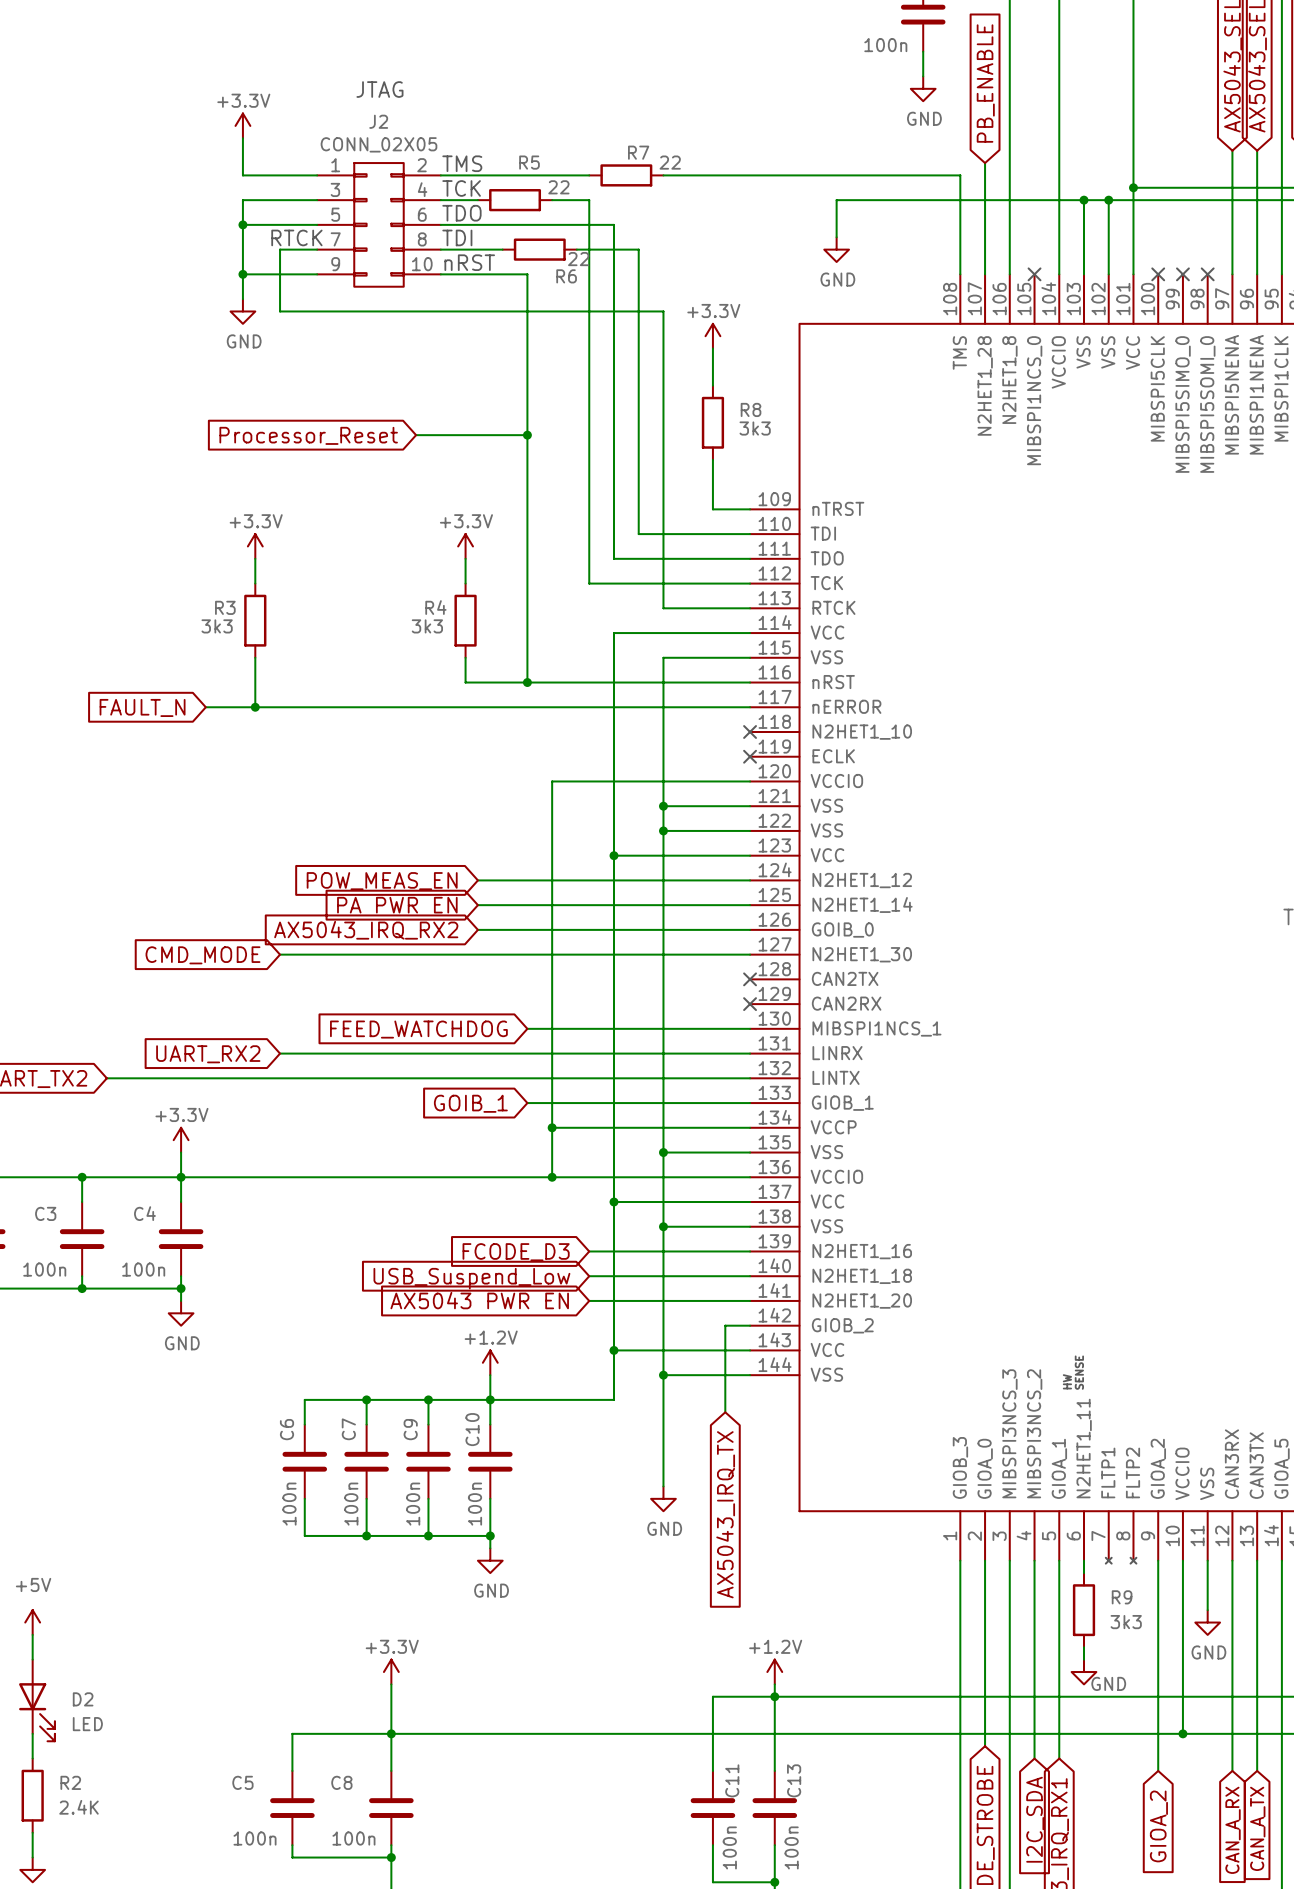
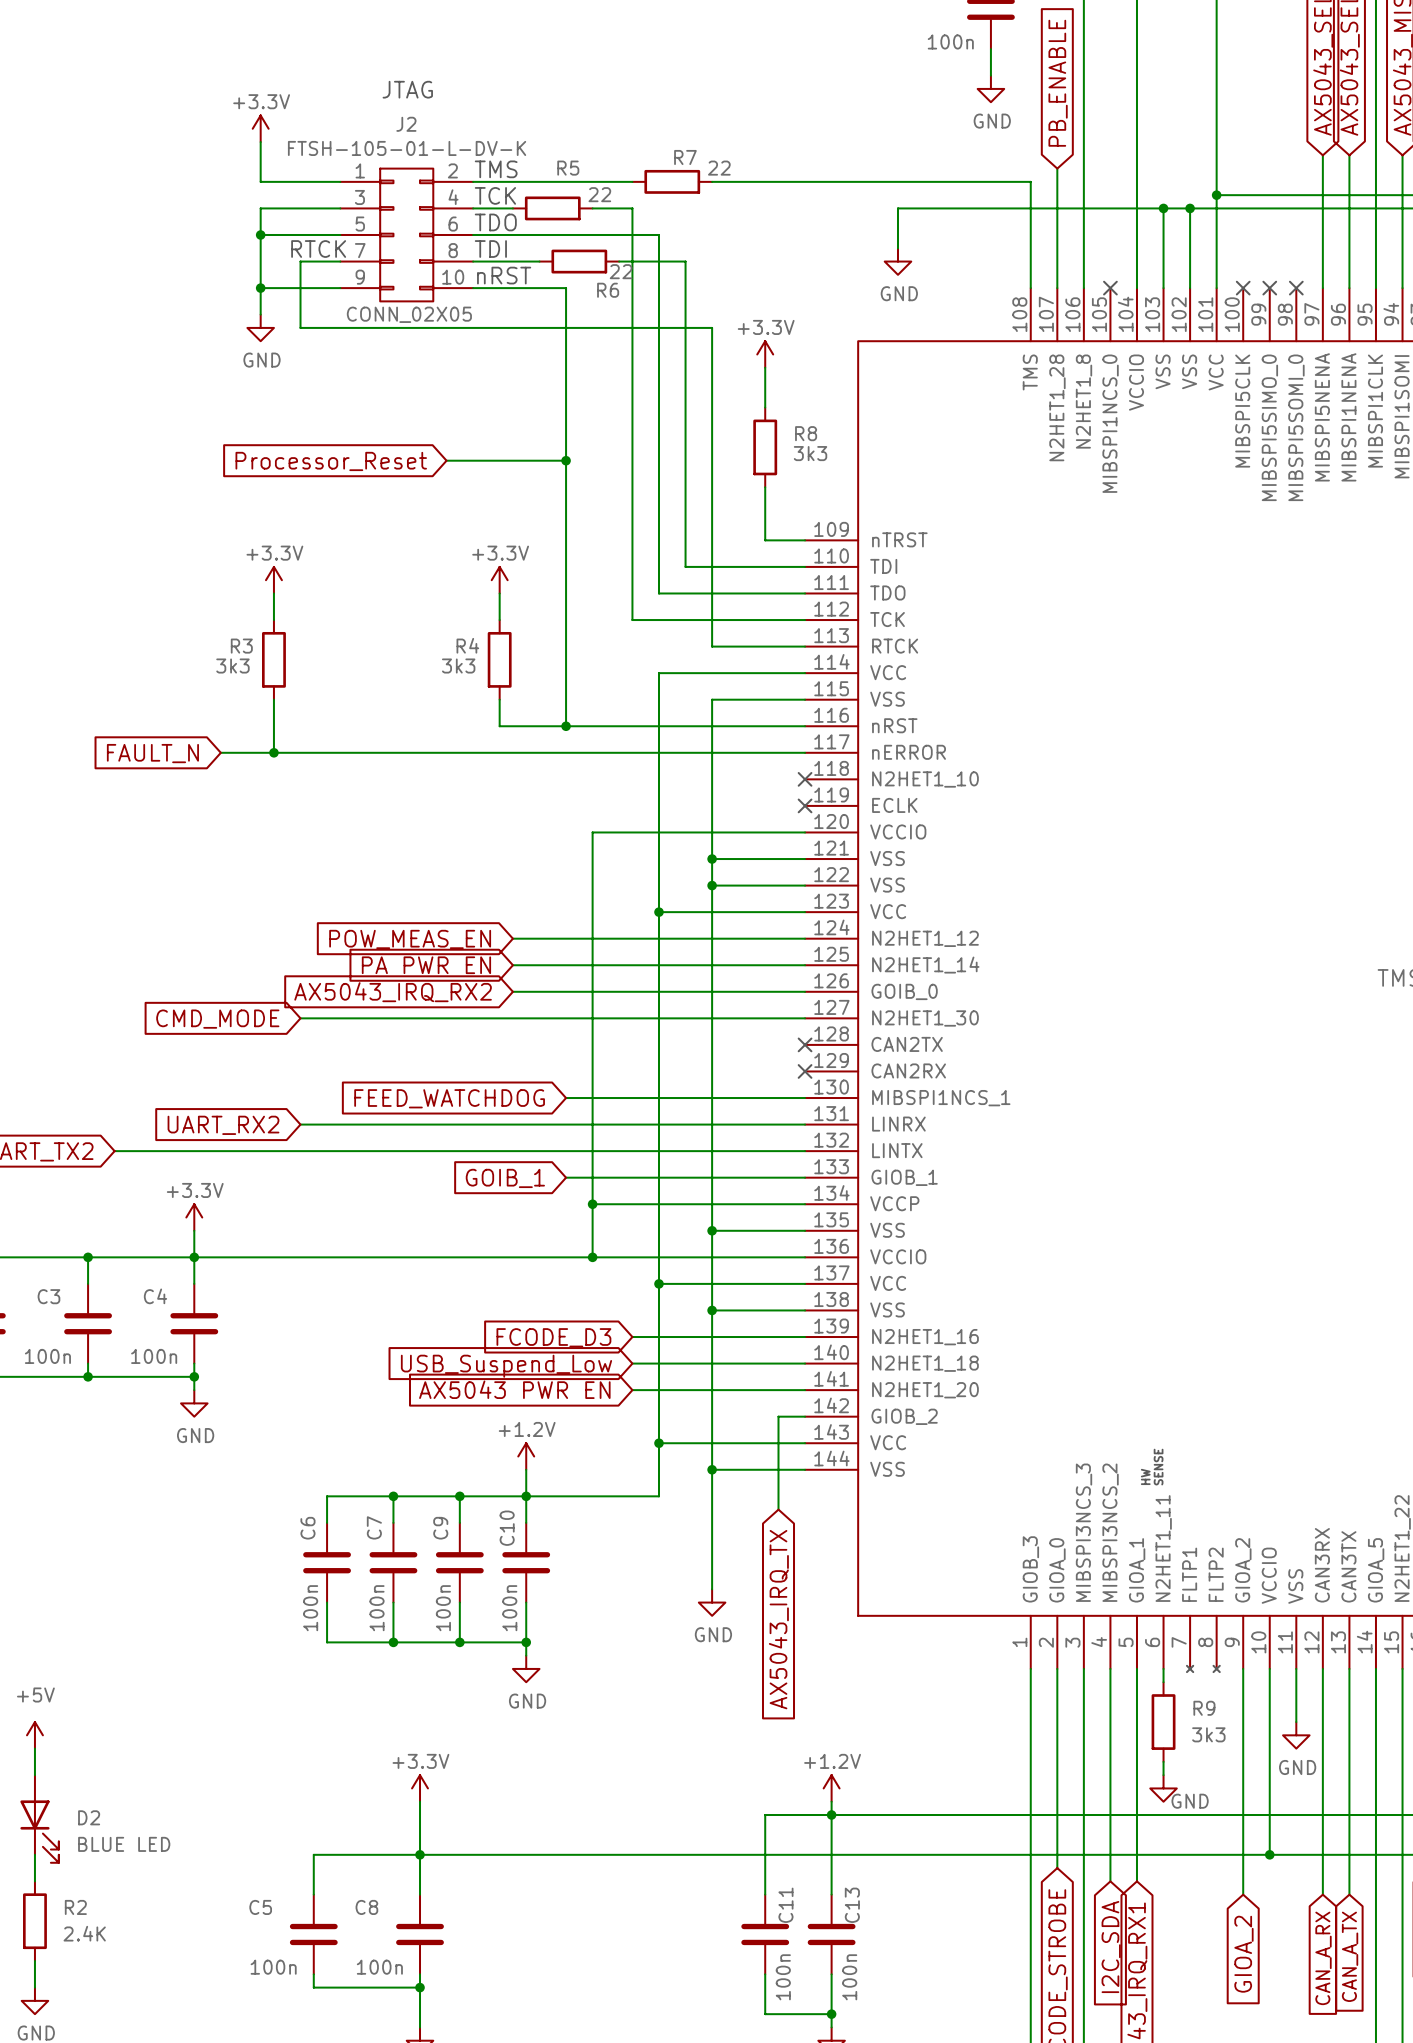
J2 value: CONN_02X05 (378, 144) -> FTSH-105-01-L-DV-K (407, 148)
J2 text: none -> CONN_02X05 (409, 314)
D2 value: LED (87, 1724) -> BLUE LED (124, 1844)

